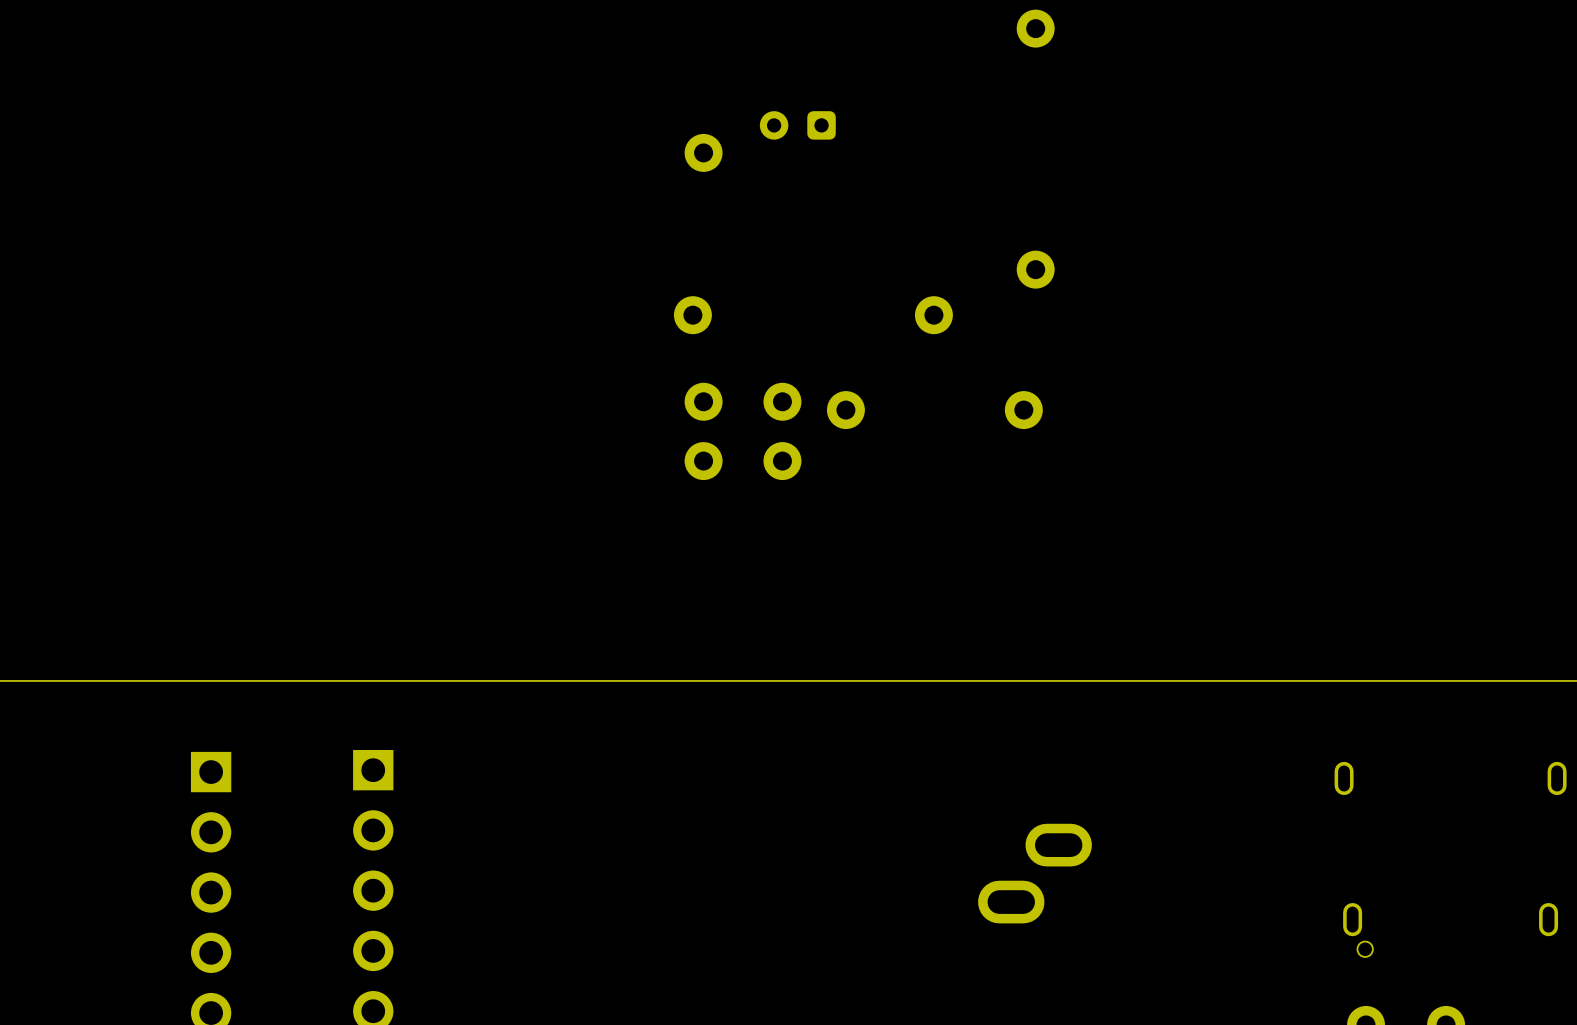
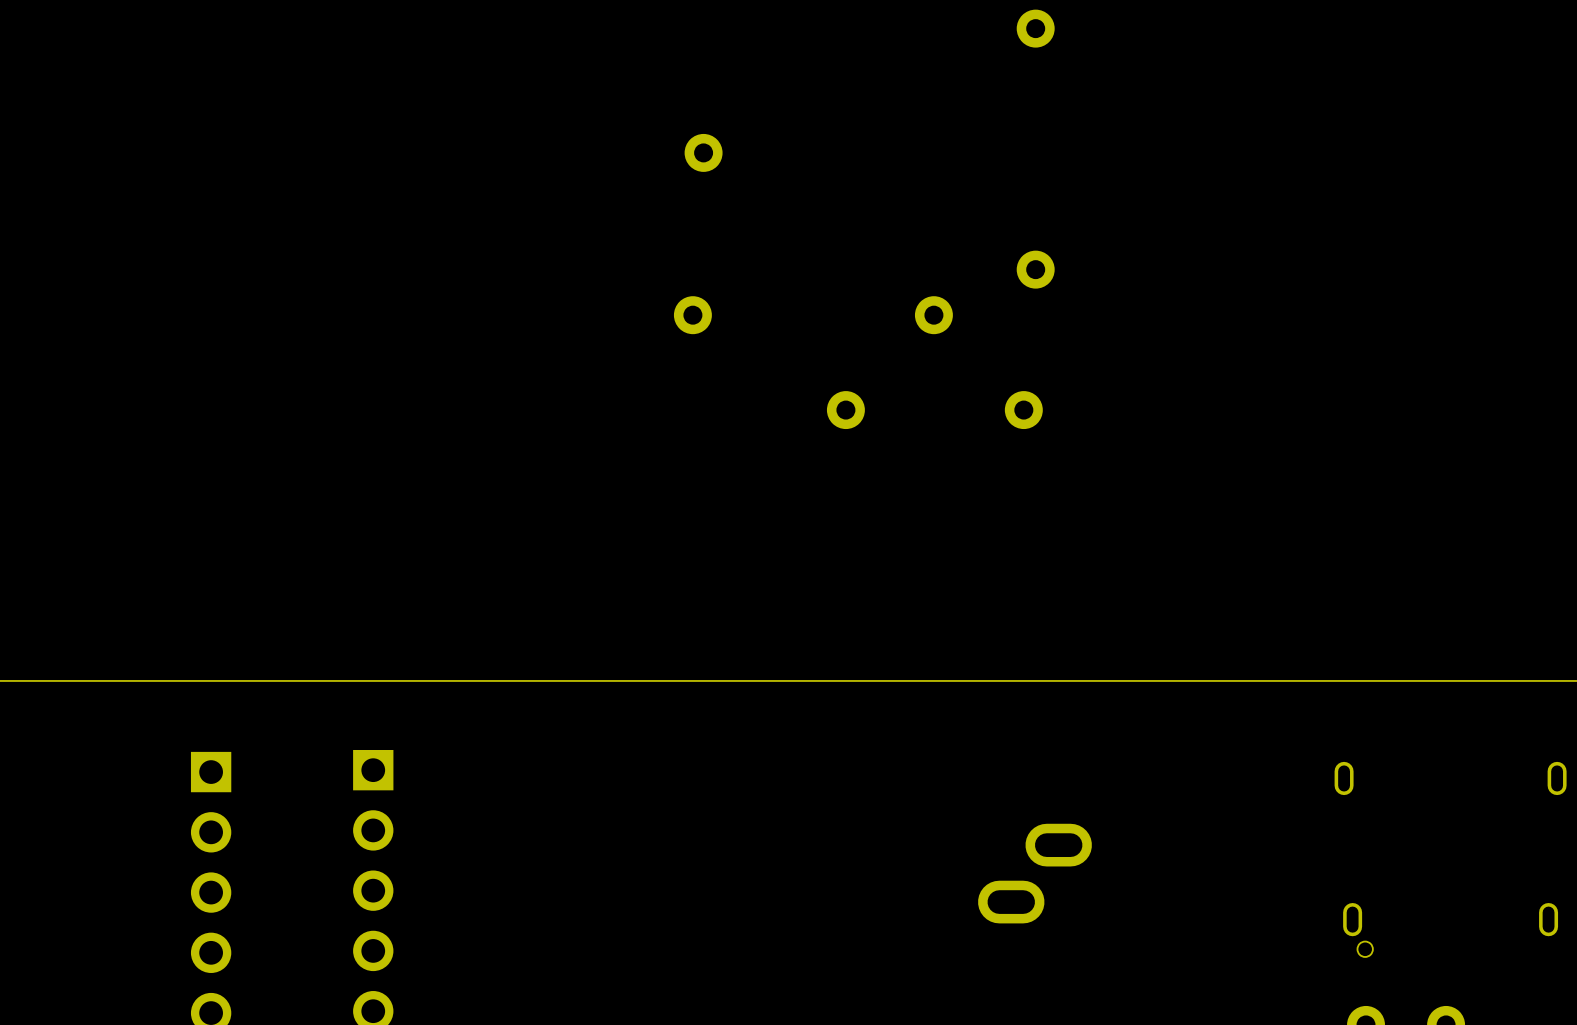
part: (797, 125) -> none
part: (703, 431) -> none
part: (782, 431) -> none

